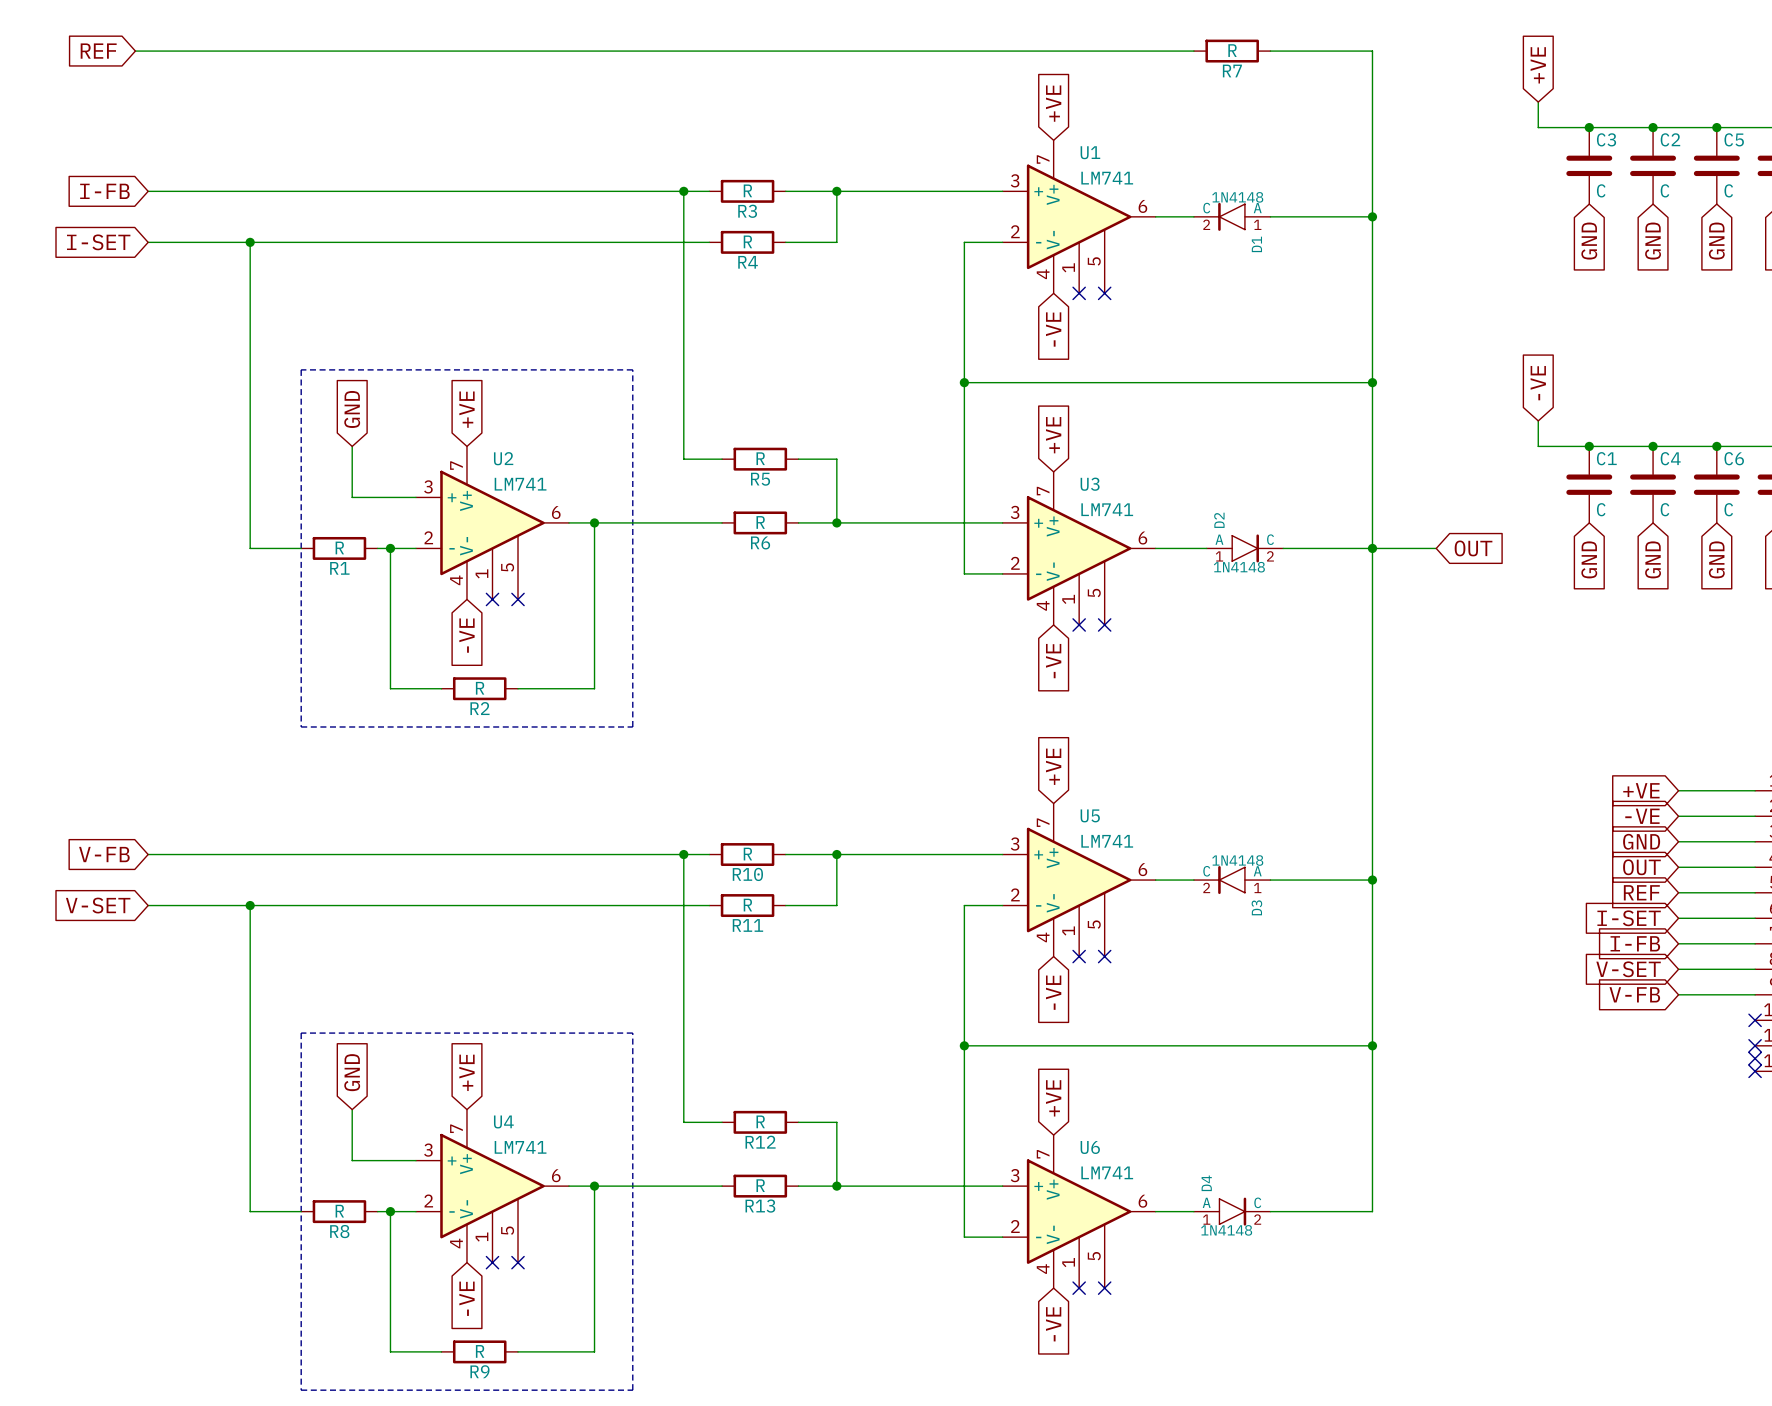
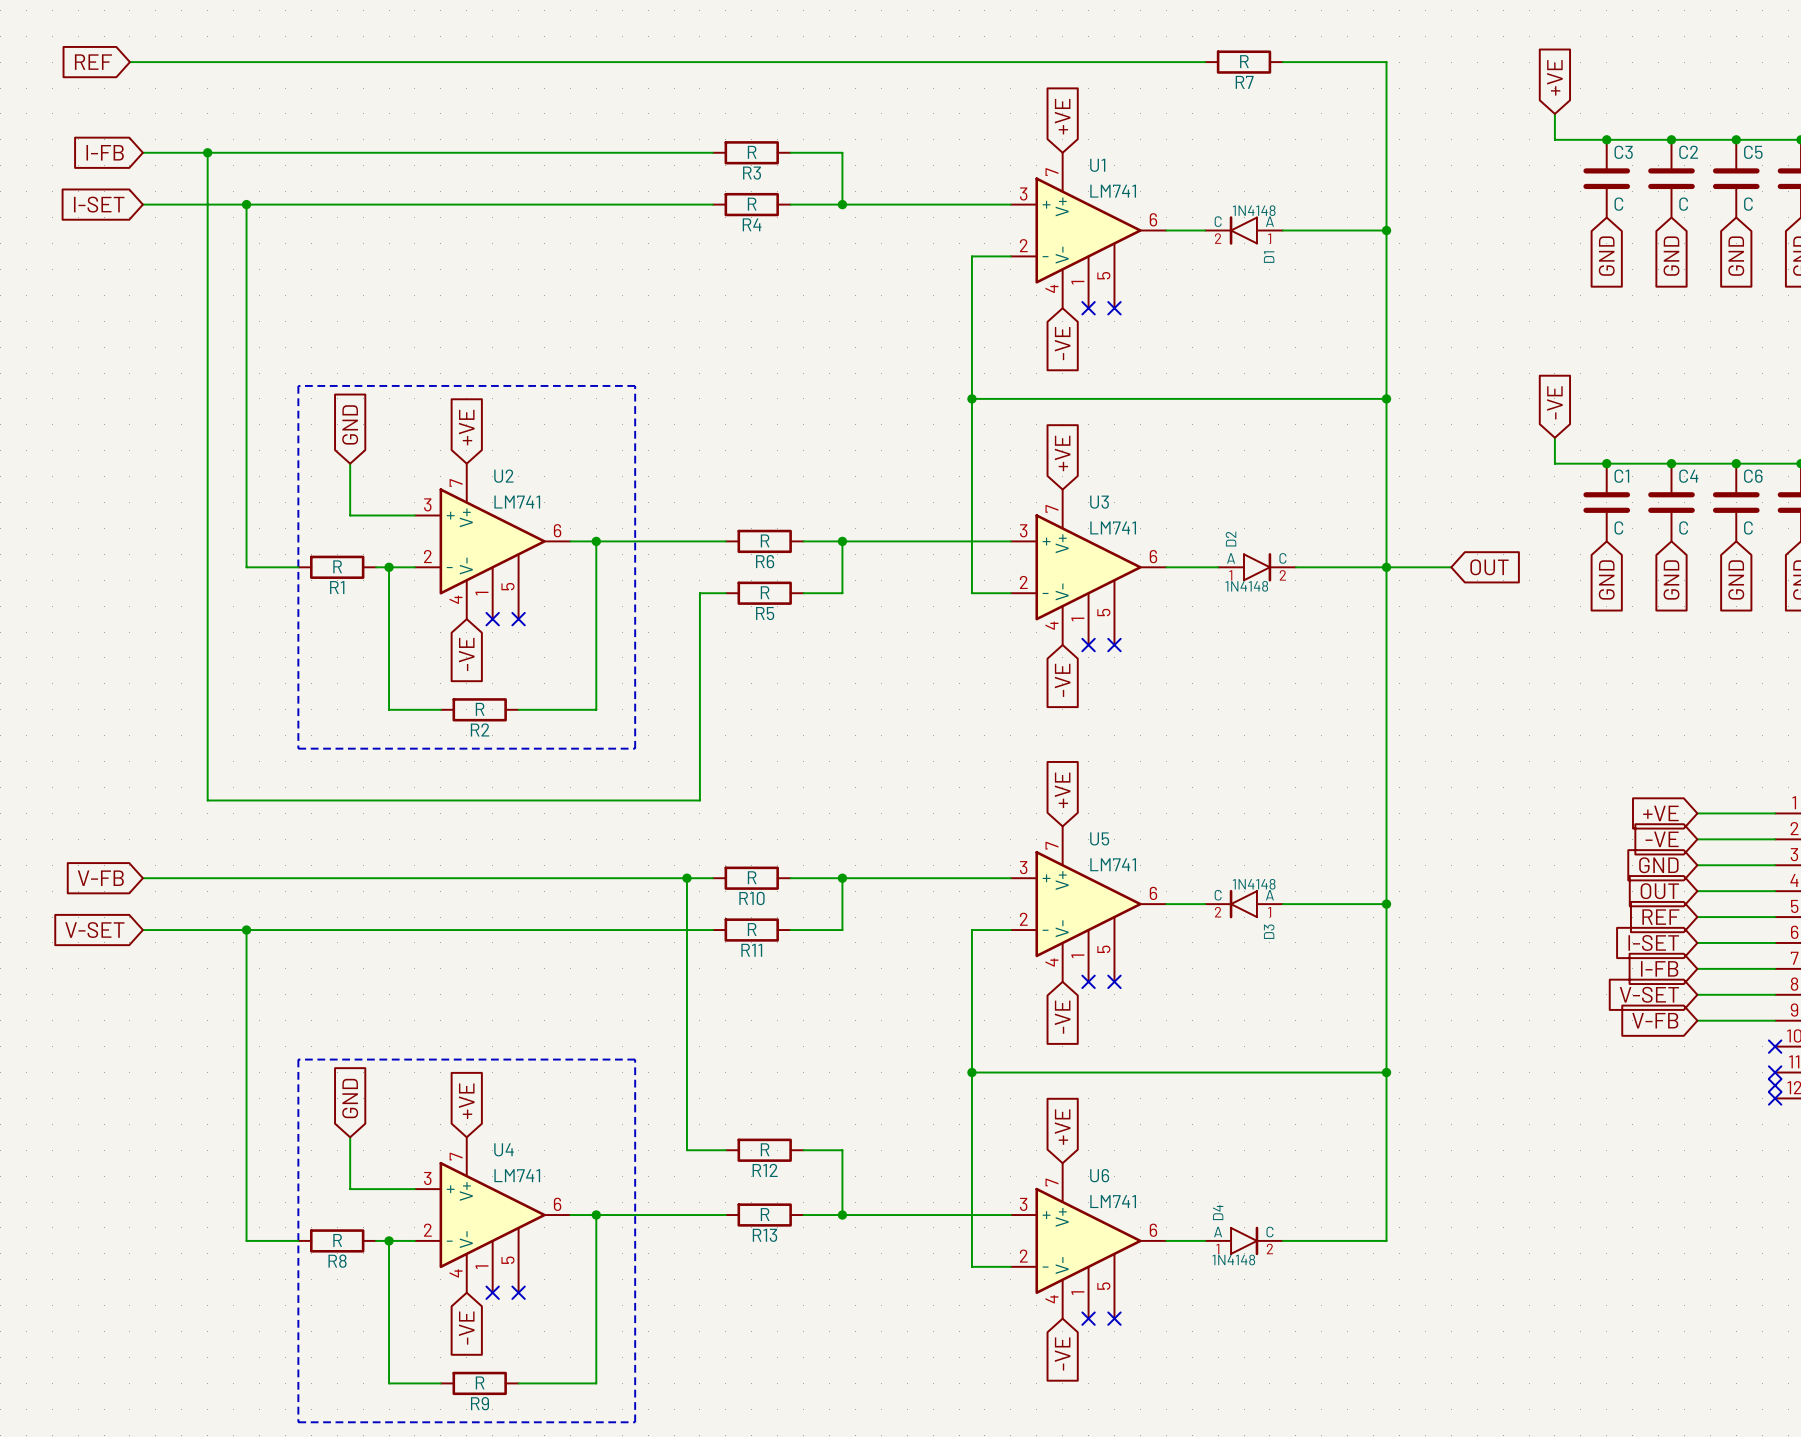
global label: none -> I-FB (105, 152)
wire: none -> (207, 152) (207, 800) (699, 800) (699, 593) (725, 593)
junction: none -> (207, 152)
R3: none -> R (751, 152)
global label: I-FB (104, 191) -> I-SET (99, 204)
wire: none -> (246, 204) (246, 256)
wire: (683, 191) (683, 459) (722, 459) -> none
junction: (683, 191) -> none
wire: (836, 191) (836, 242) (785, 242) -> (842, 204) (842, 152) (790, 152)
R3 name: R3 (747, 211) -> R4 (752, 224)
global label: I-SET (98, 242) -> none
wire: (148, 242) (709, 242) -> (142, 152) (712, 152)
junction position: (250, 242) -> (246, 204)
R4: R (747, 242) -> none
R5 position: (760, 459) -> (764, 593)
wire: (798, 459) (836, 459) (836, 522) -> (803, 593) (842, 593) (842, 541)

